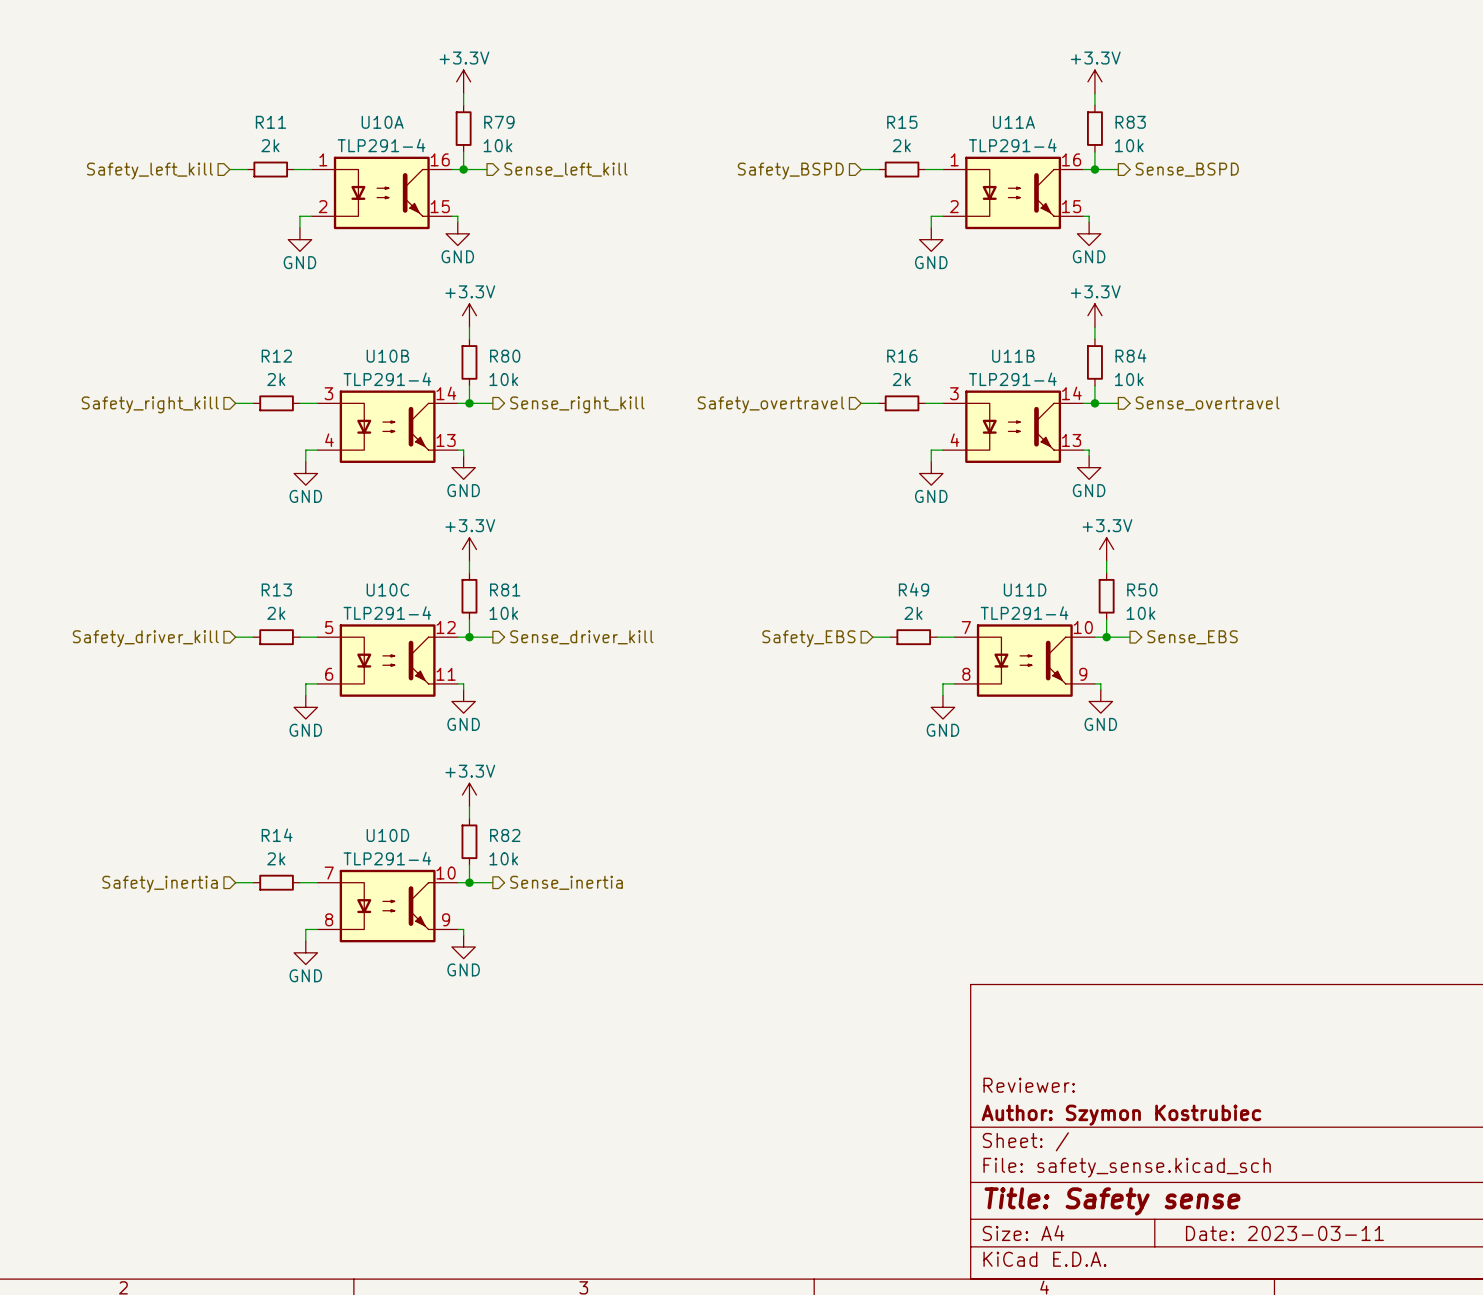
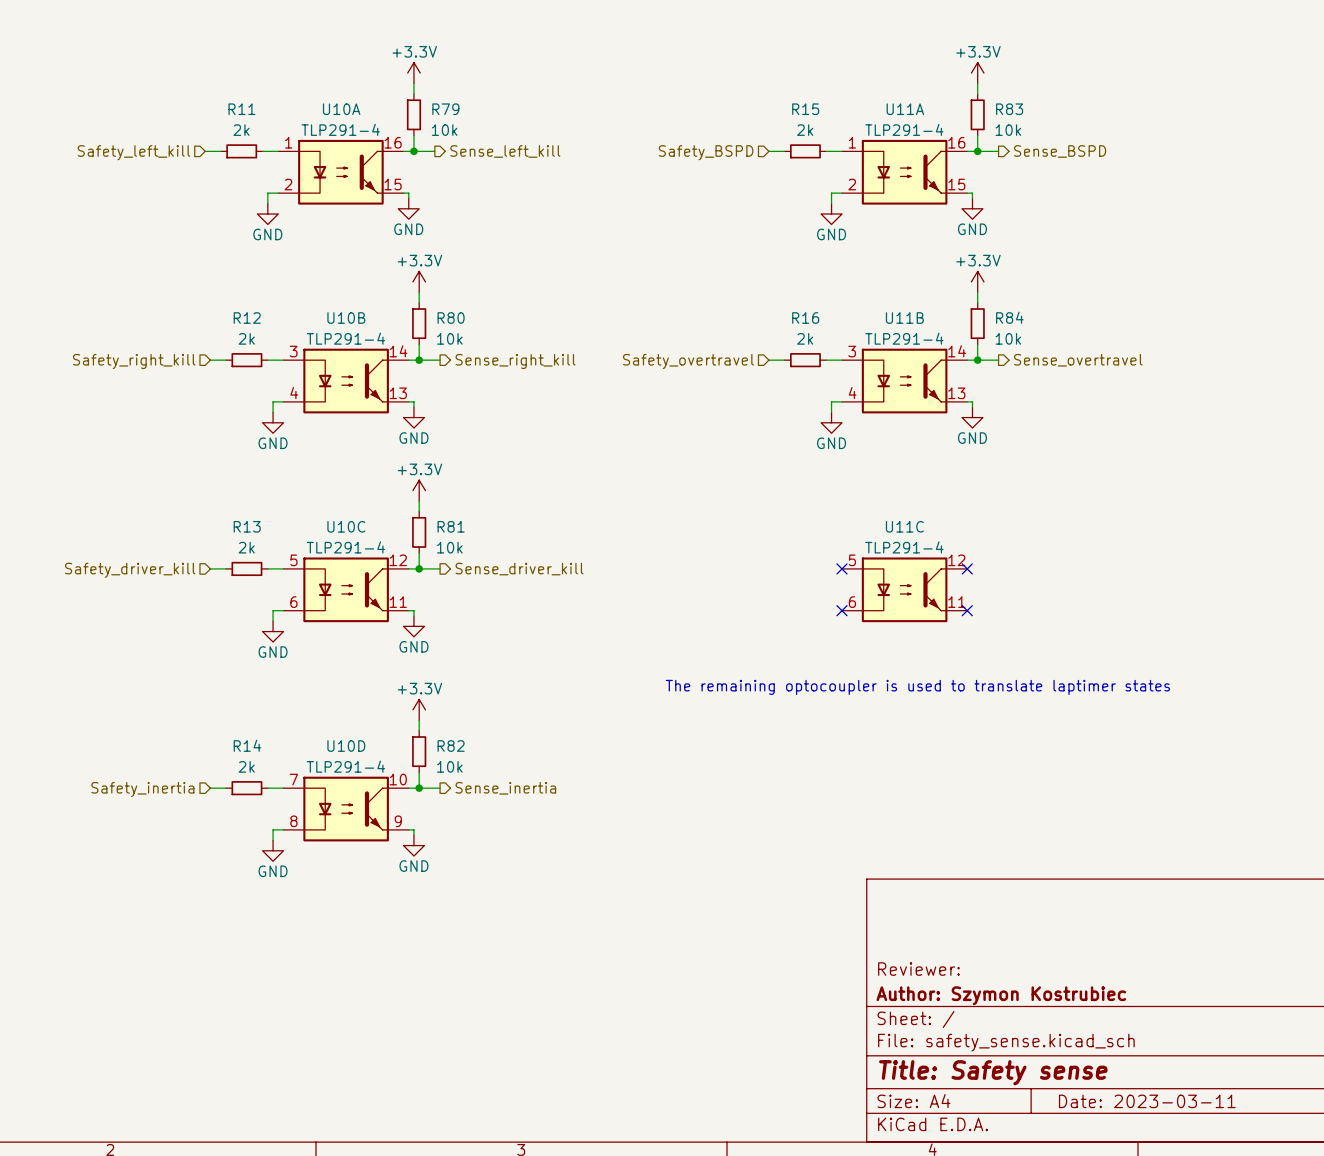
power symbol: +3.3V (1106, 549) -> none
wire: (1106, 561) (1106, 572) -> none
R50: 10k (1106, 596) -> none
wire: (1106, 619) (1106, 637) -> none
wire: (872, 637) (890, 637) -> none
R49: 2k (913, 637) -> none
no-connect mark: none -> (841, 568)
no-connect mark: none -> (967, 568)
wire: (1094, 637) (1130, 637) -> none
junction: (1106, 637) -> none
hierarchical label: Sense_EBS (1192, 637) -> none
hierarchical label: Safety_EBS (808, 638) -> none
U11C: none -> TLP291-4 (904, 589)
U11D: TLP291-4 (1024, 660) -> none
no-connect mark: none -> (841, 610)
no-connect mark: none -> (967, 610)
wire: (1094, 683) (1100, 683) (1100, 689) -> none
power symbol: GND (1100, 701) -> none
power symbol: GND (942, 707) -> none
text: none -> The remaining optocoupler is used to translate laptimer states (917, 687)

